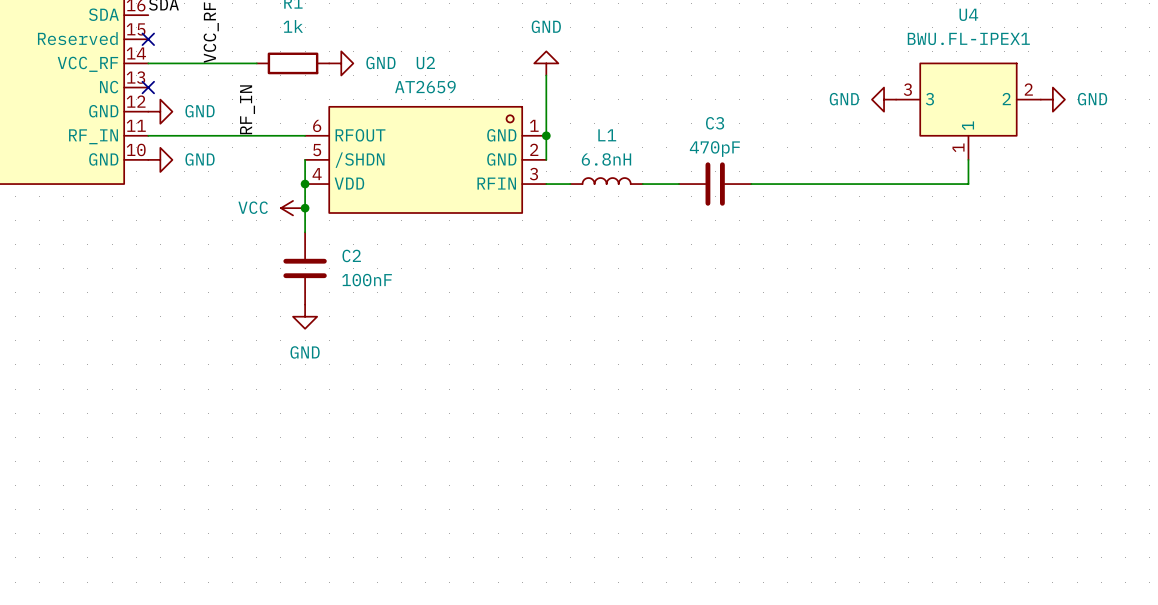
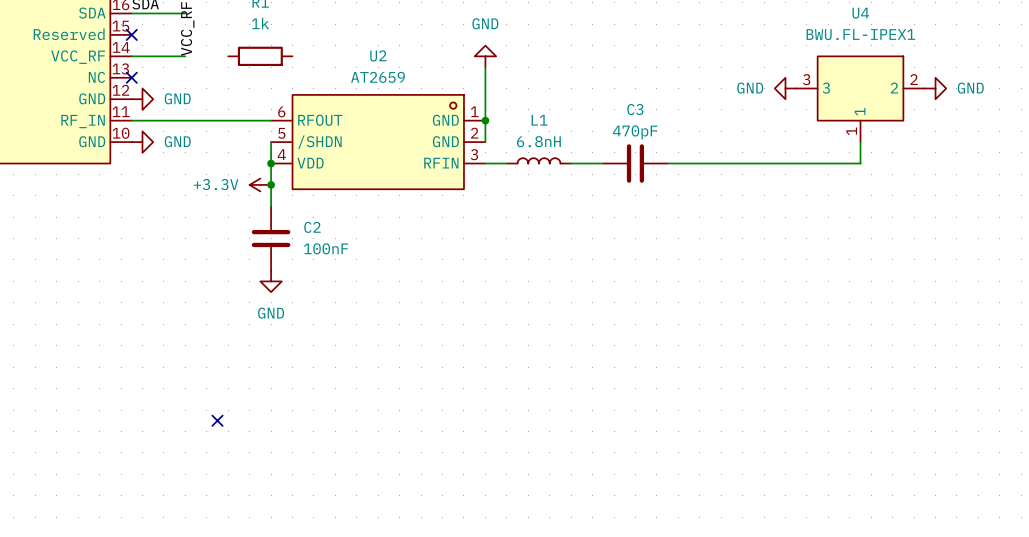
wire: none -> (131, 13) (185, 13)
wire: (208, 63) (256, 63) -> none
power symbol: GND (341, 63) -> none
label: RF_IN (247, 109) -> none
power symbol: VCC (293, 208) -> +3.3V (260, 184)
no-connect mark: none -> (217, 420)

